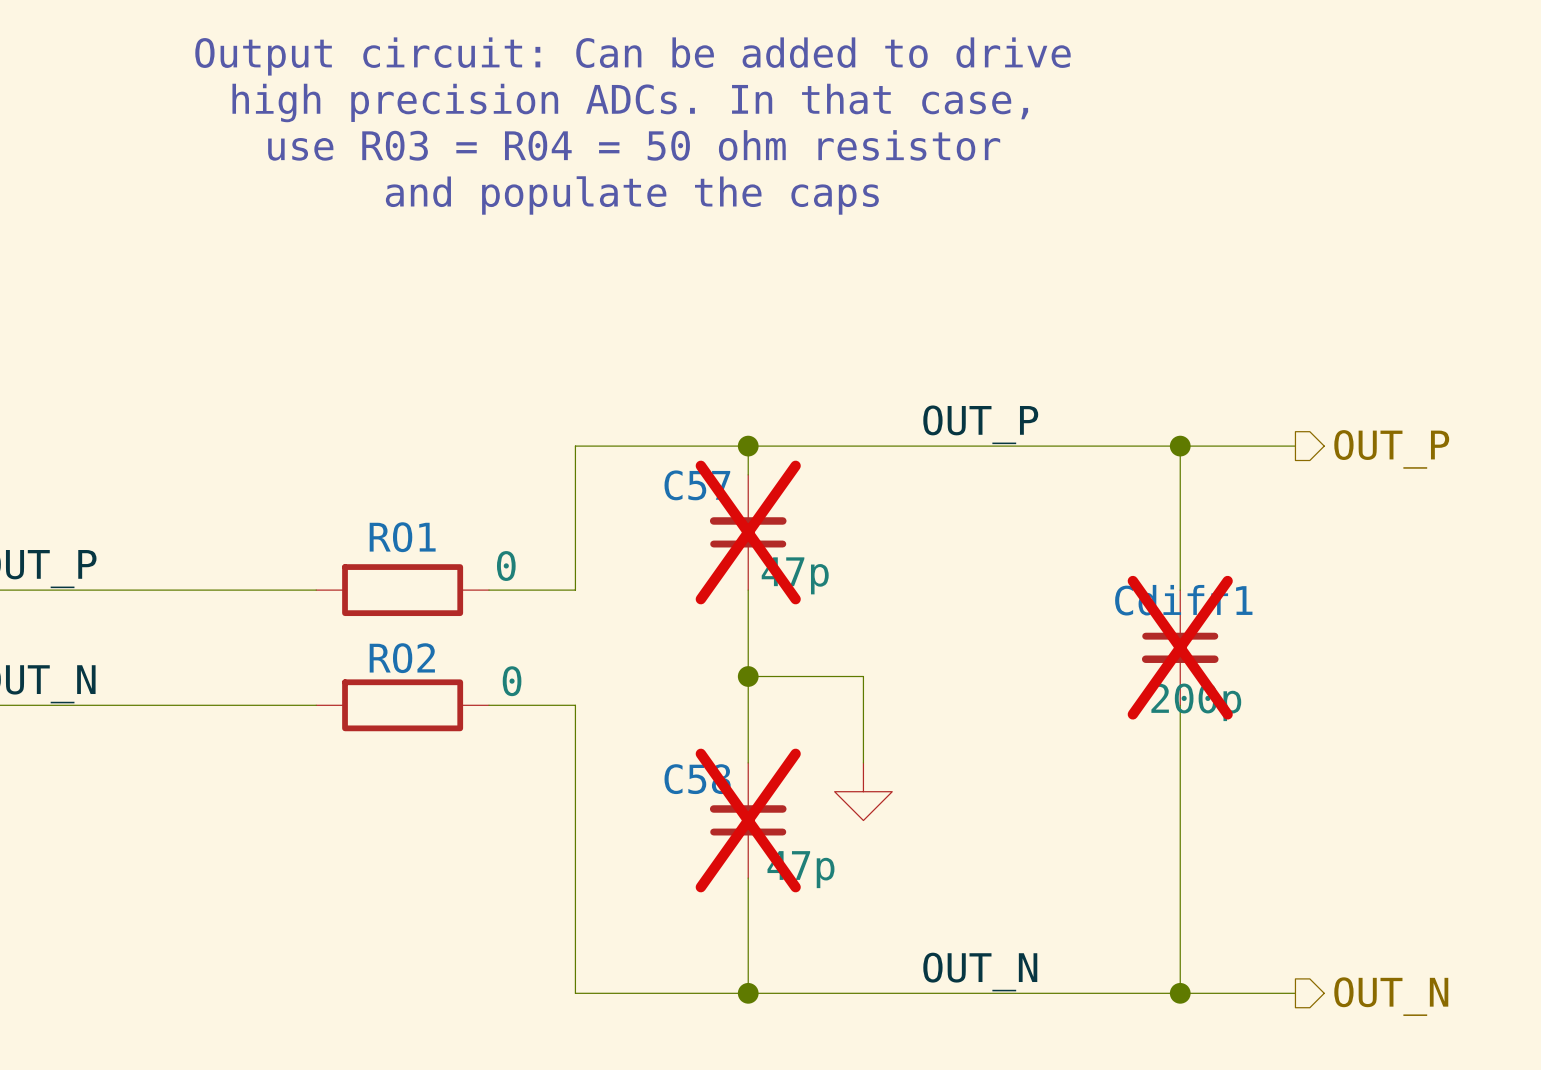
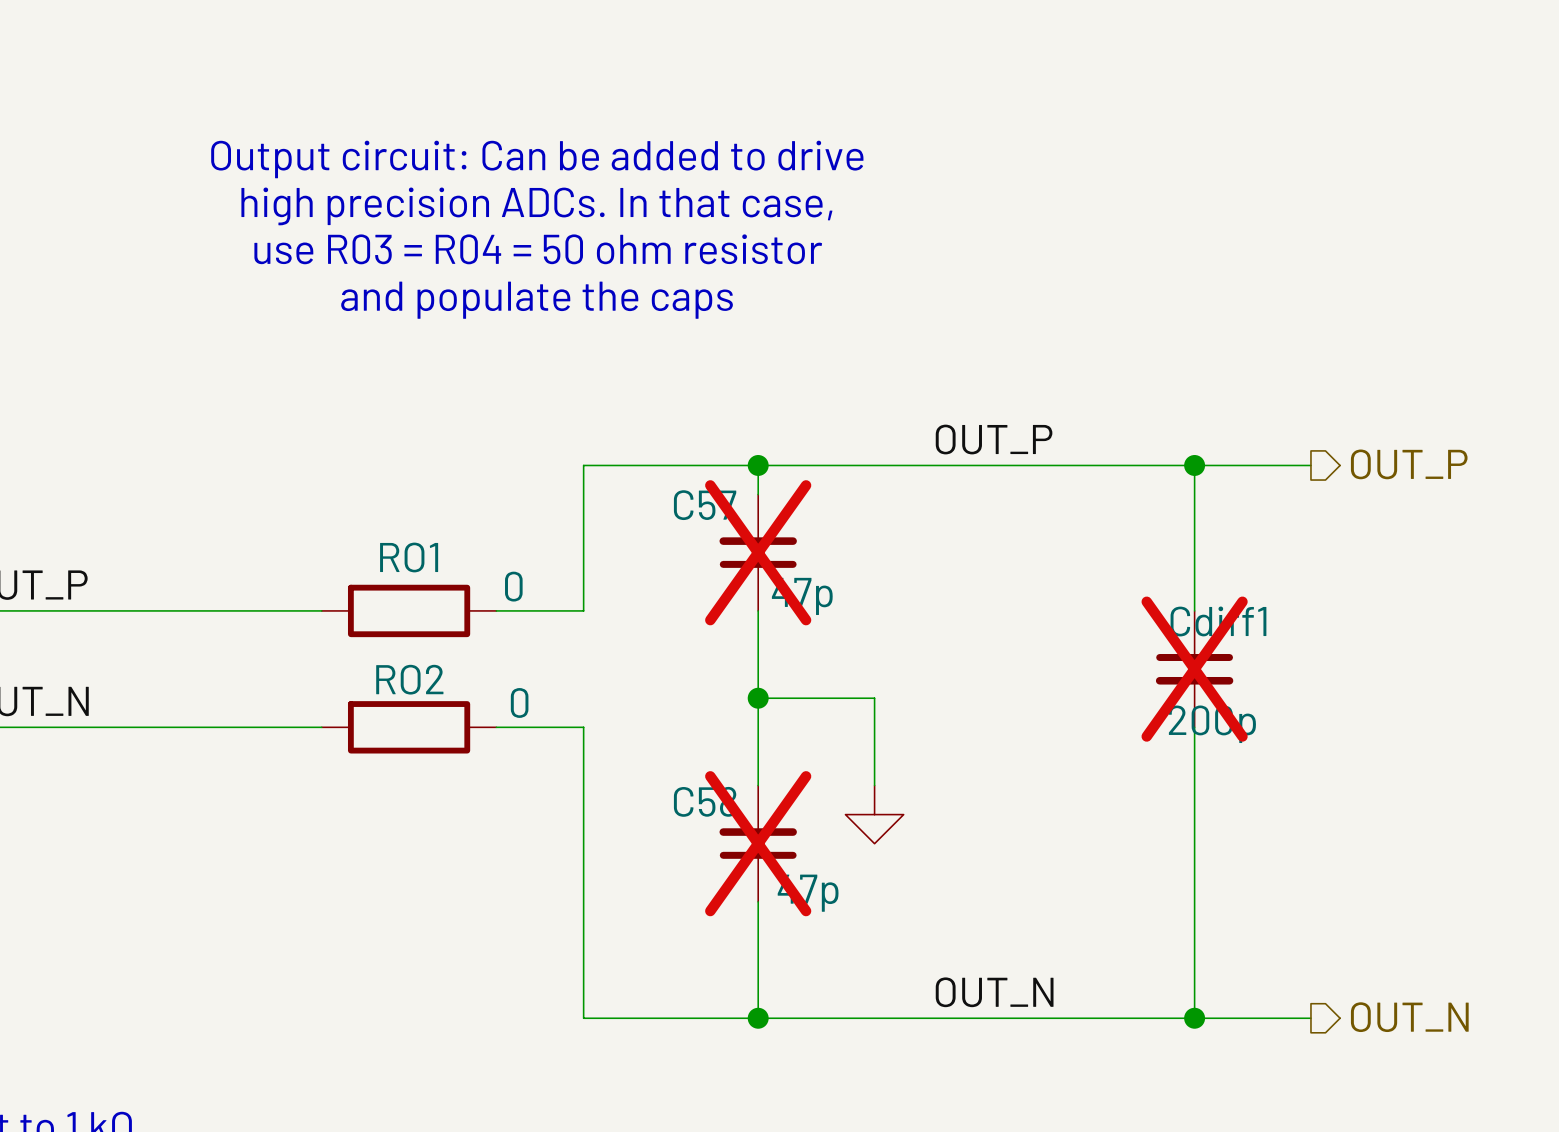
text position: Output circuit: Can be added to drive (632, 56) -> Output circuit: Can be added to drive (537, 159)
text position: high precision ADCs. In that case, (630, 102) -> high precision ADCs. In that case, (536, 206)
text position: use R03 = R04 = 50 ohm resistor (634, 145) -> use R03 = R04 = 50 ohm resistor (538, 249)
text position: and populate the caps (632, 195) -> and populate the caps (537, 300)

